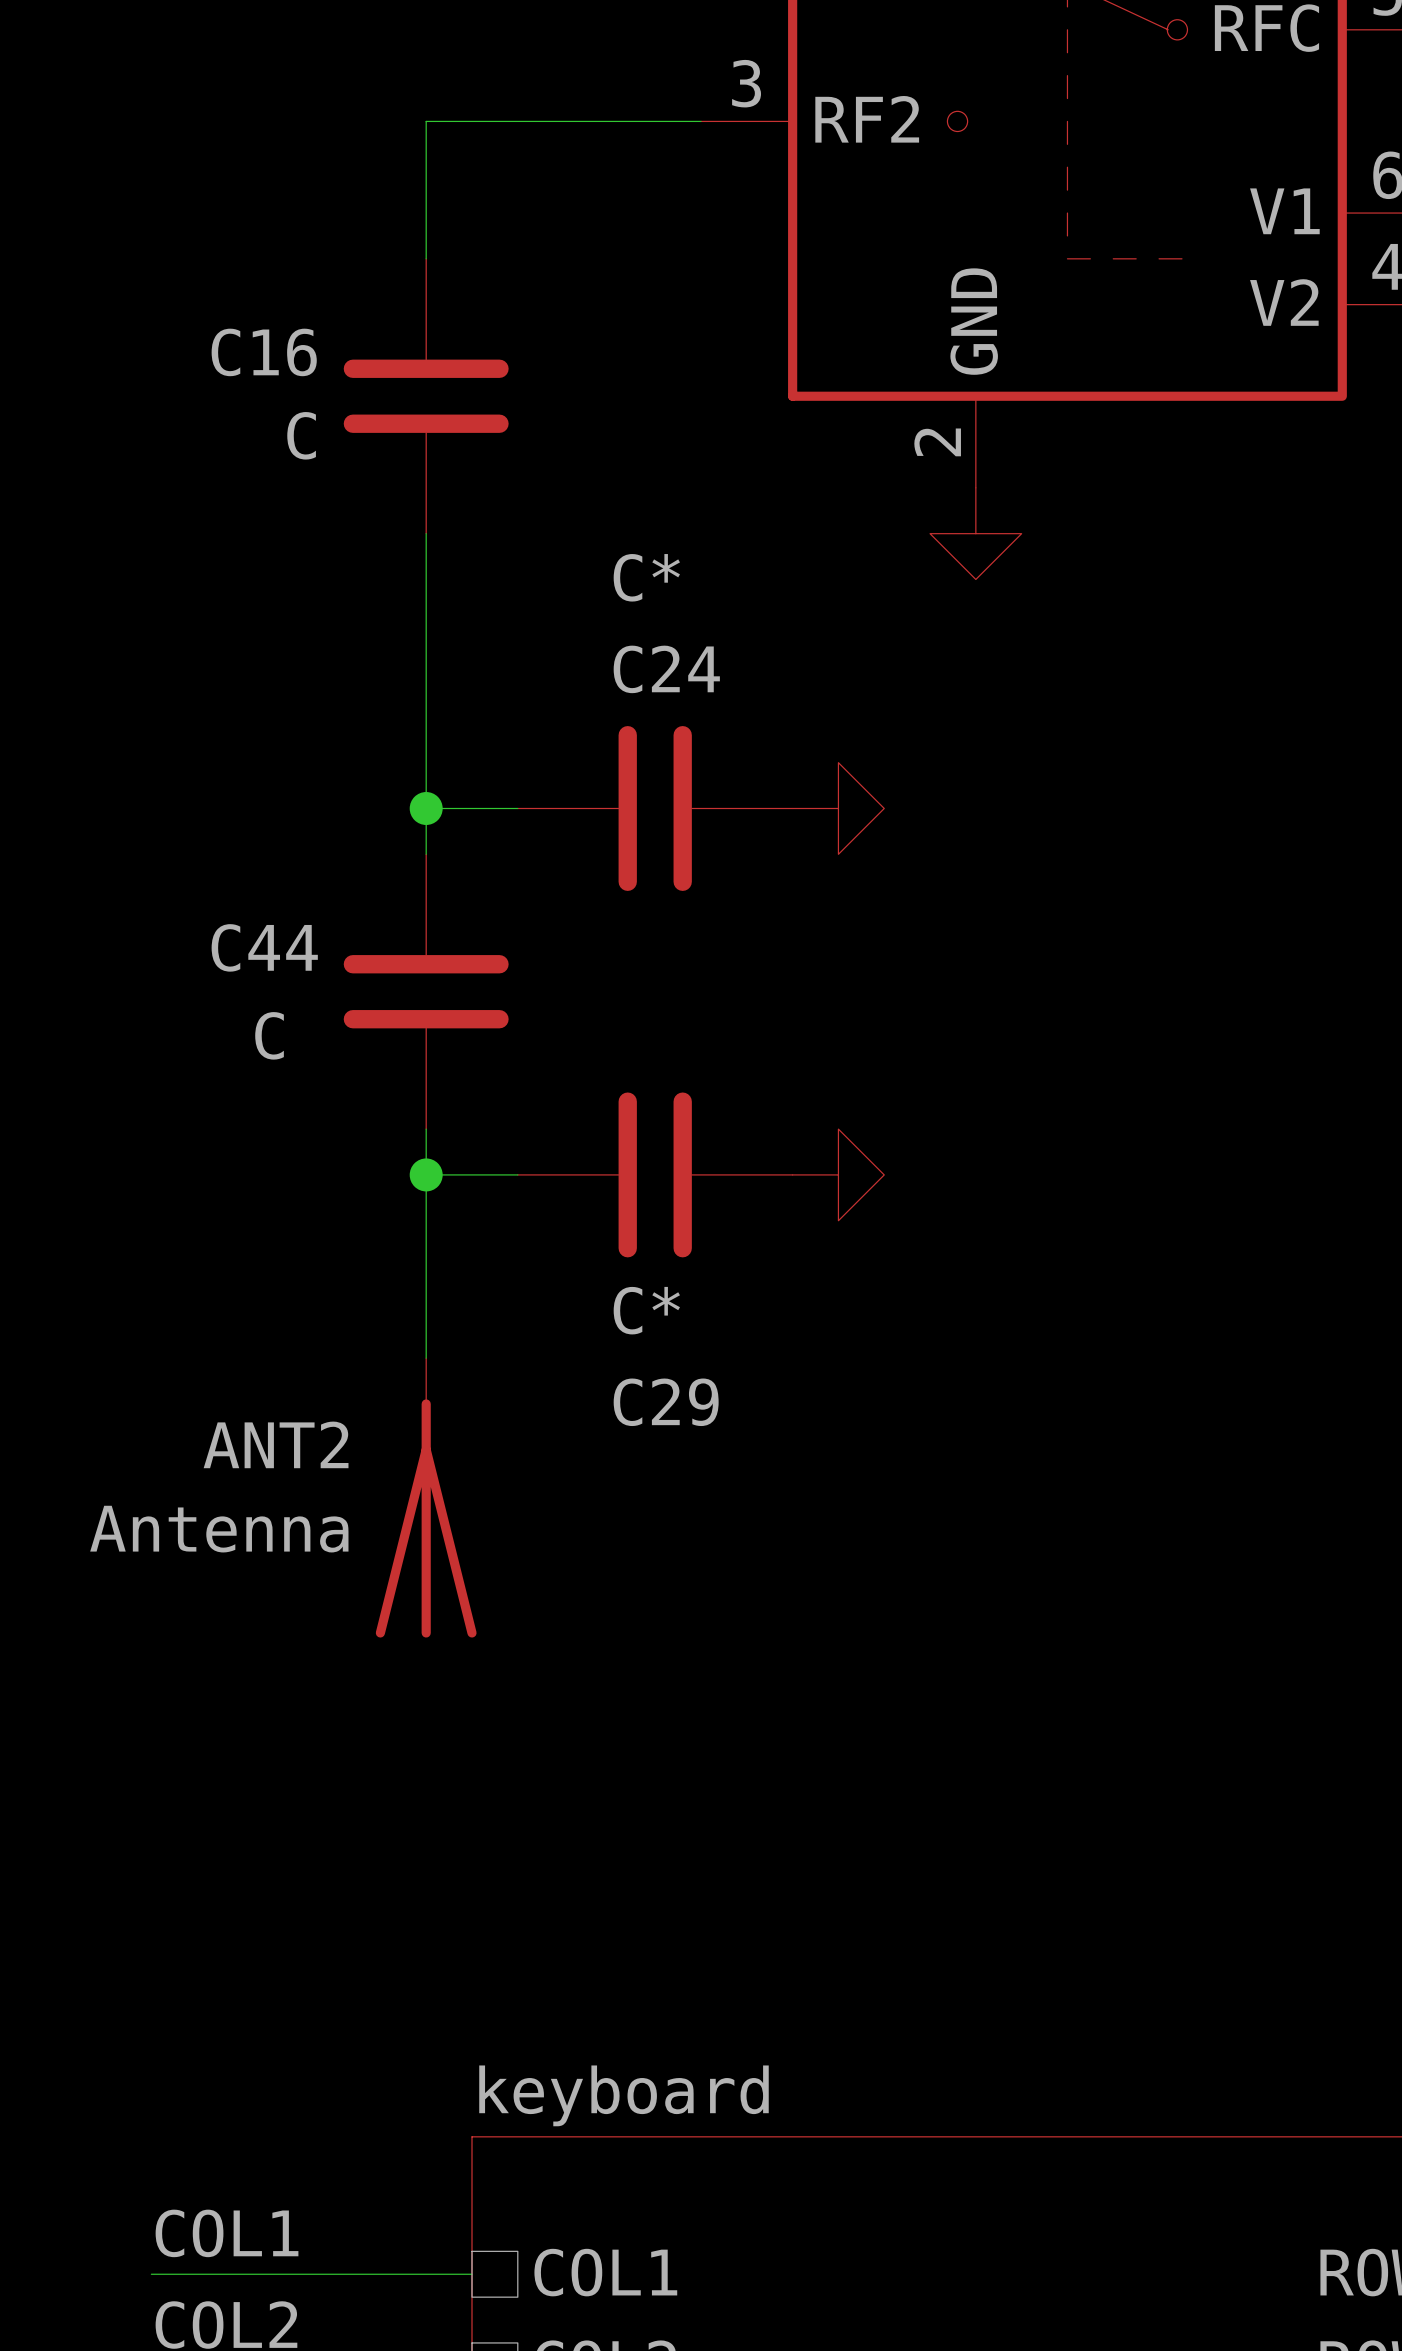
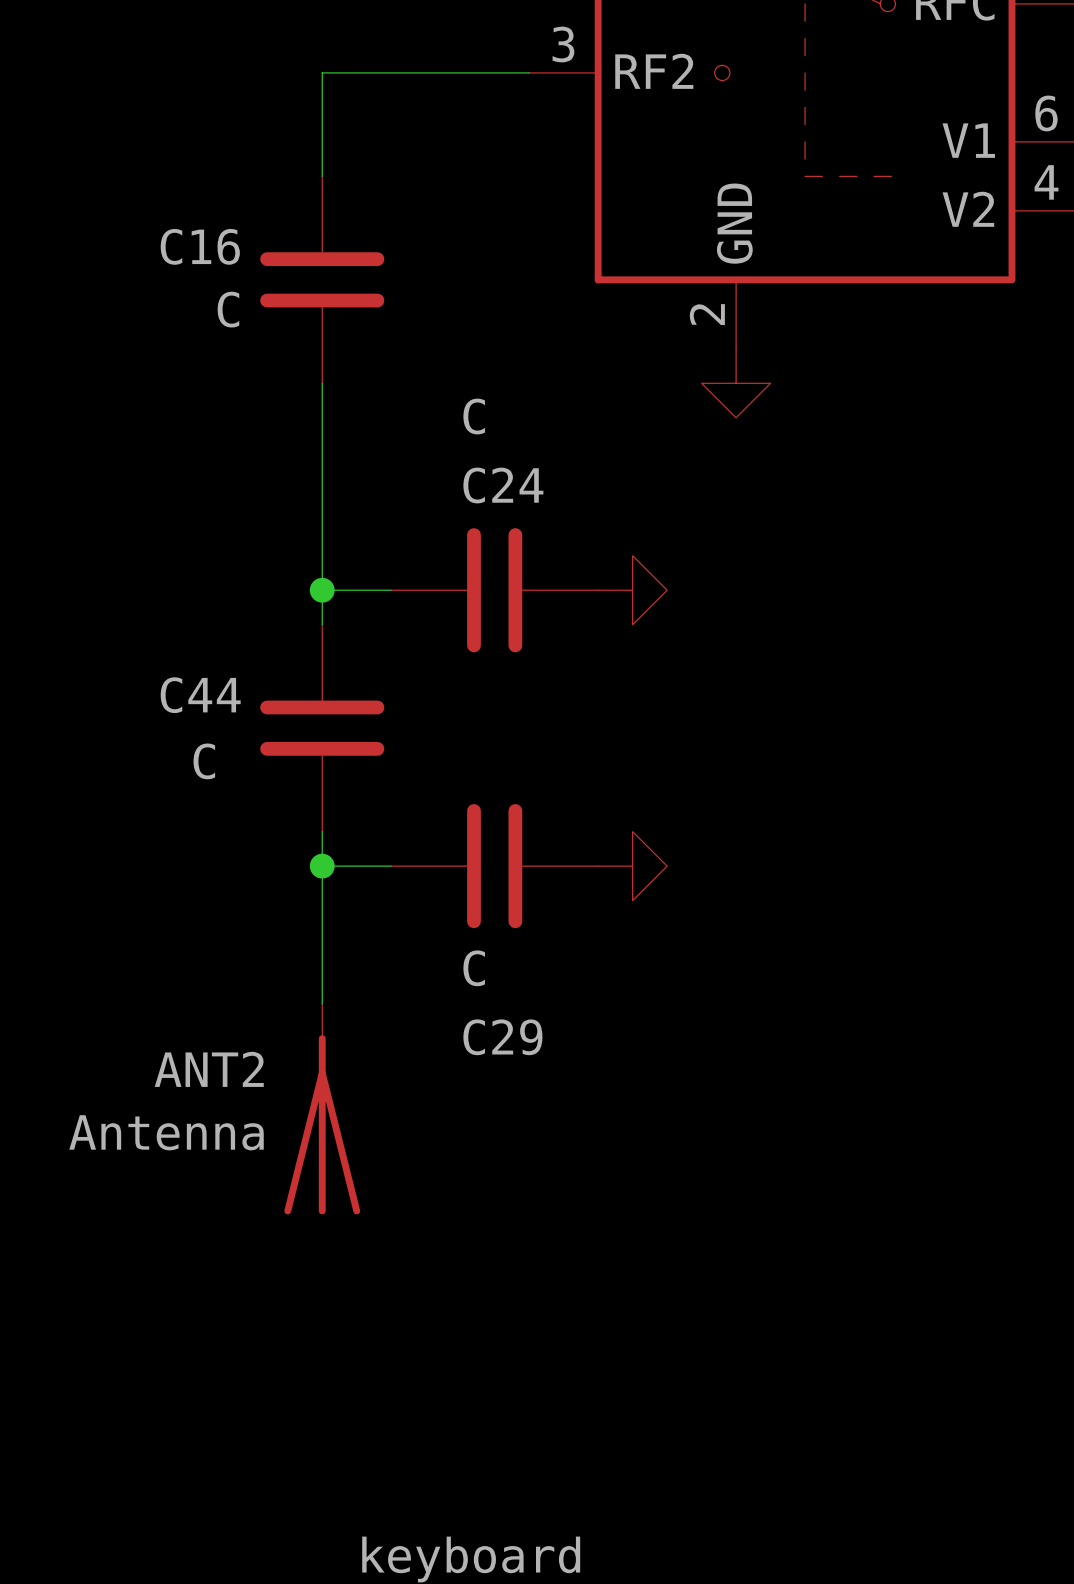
C24 value: C* (646, 577) -> C (474, 416)
C29 value: C* (646, 1310) -> C (474, 968)

